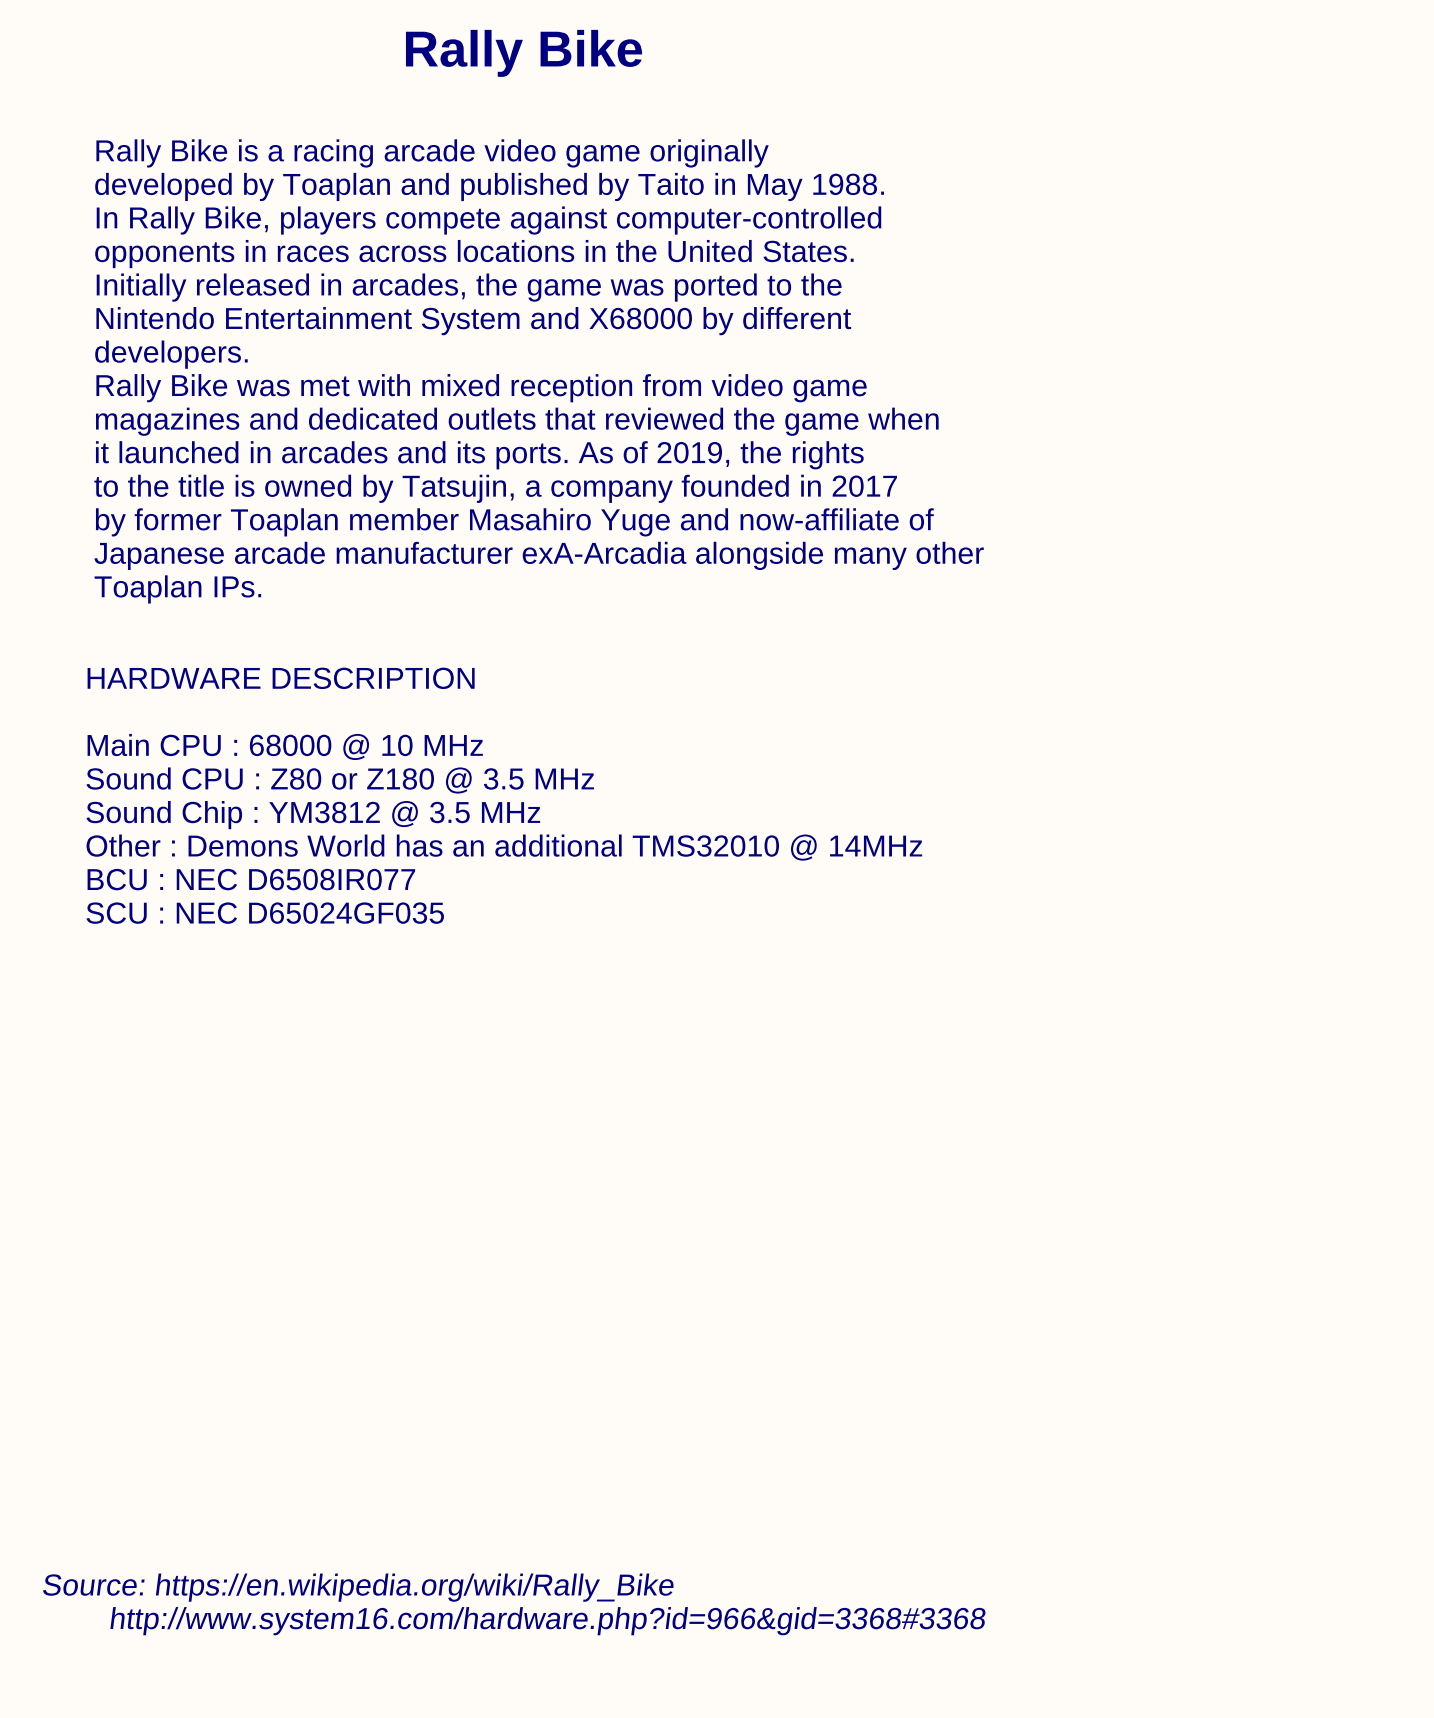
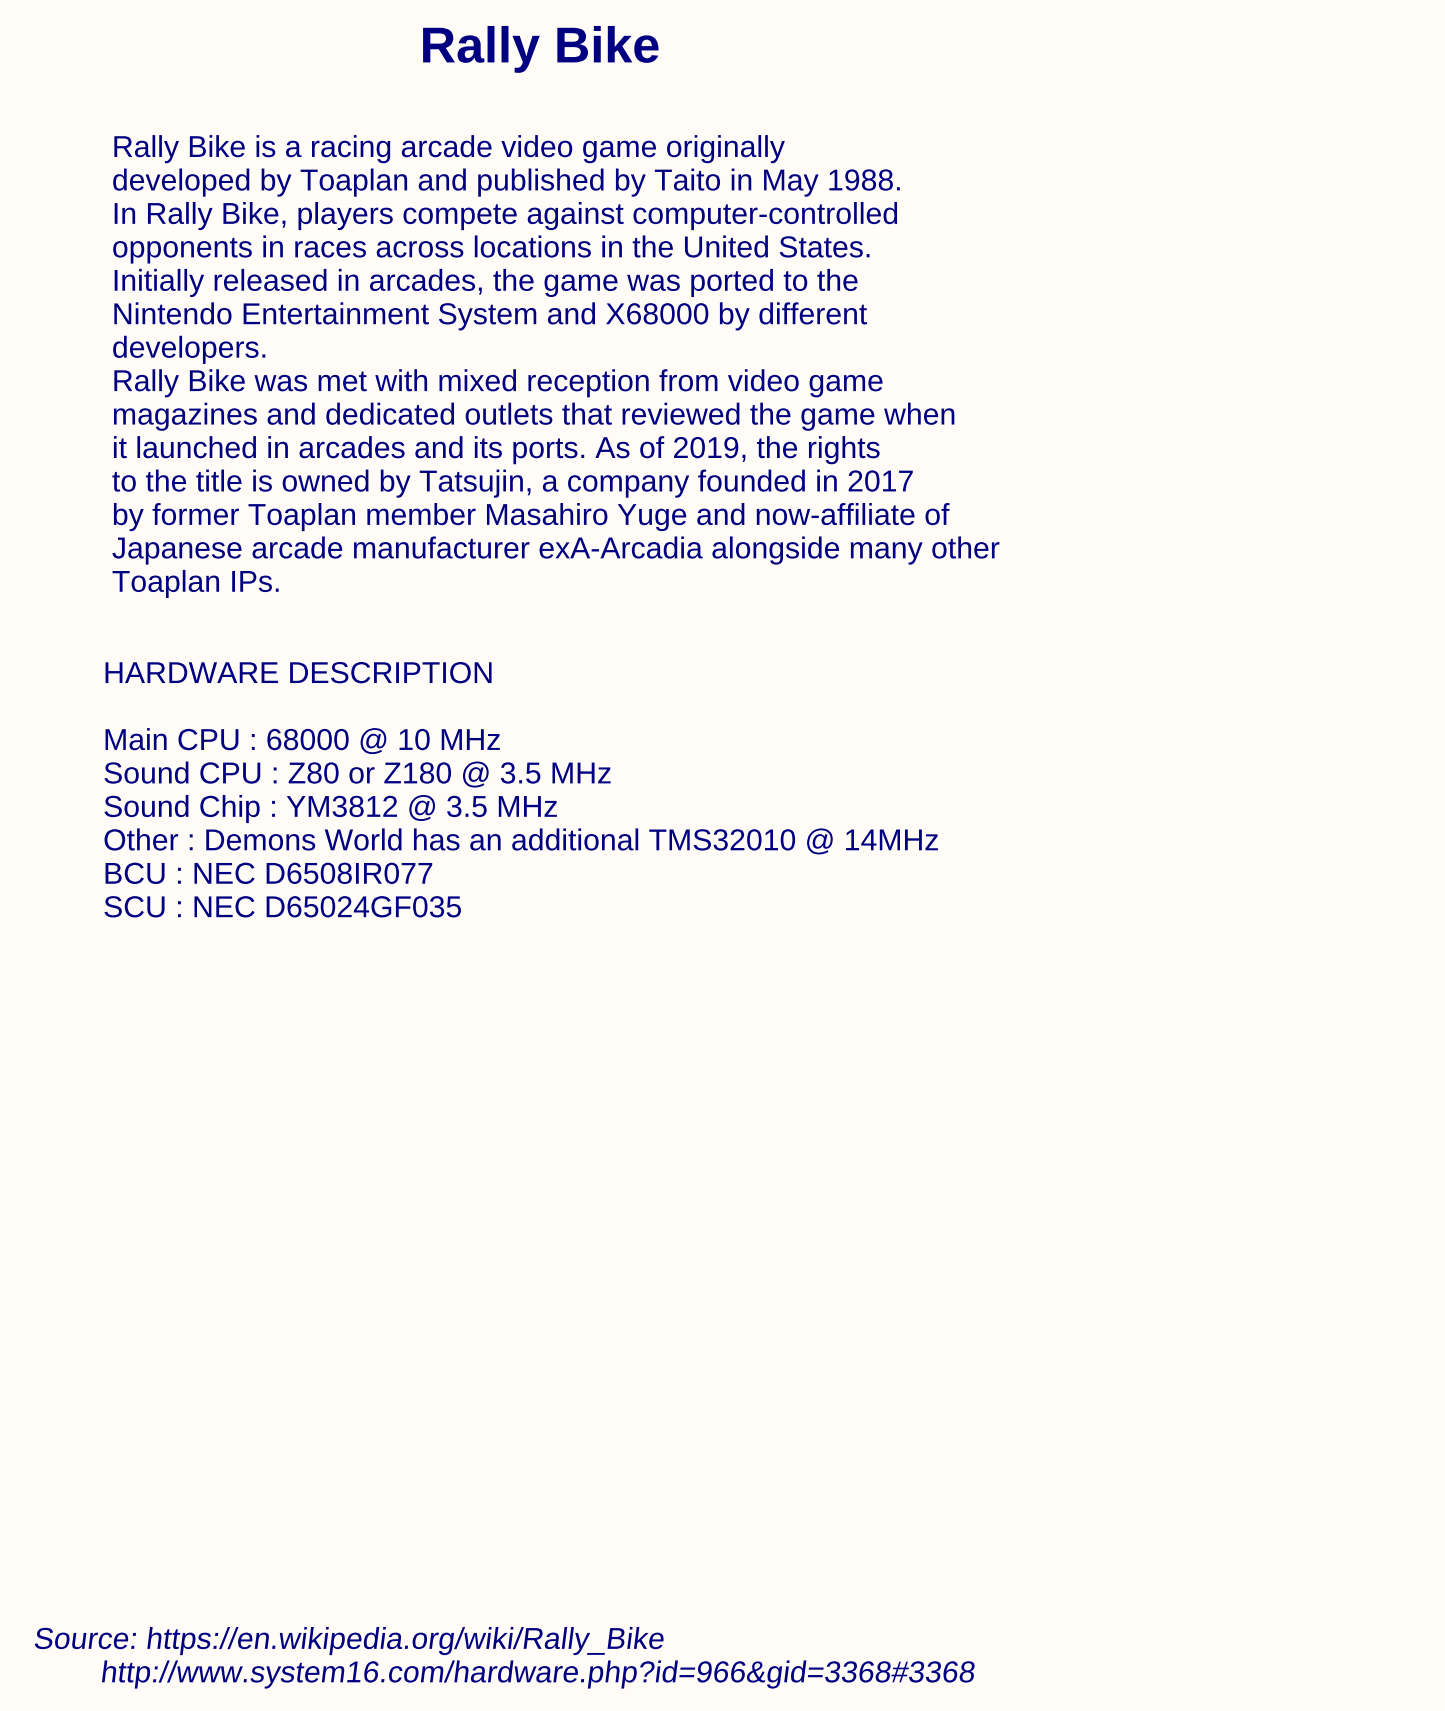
text position: Source: https://en.wikipedia.org/wiki/Rally_Bike (358, 1587) -> Source: https://en.wikipedia.org/wiki/Rally_Bike (349, 1641)
text position: http://www.system16.com/hardware.php?id=966&gid=3368#3368 (548, 1621) -> http://www.system16.com/hardware.php?id=966&gid=3368#3368 (538, 1674)

